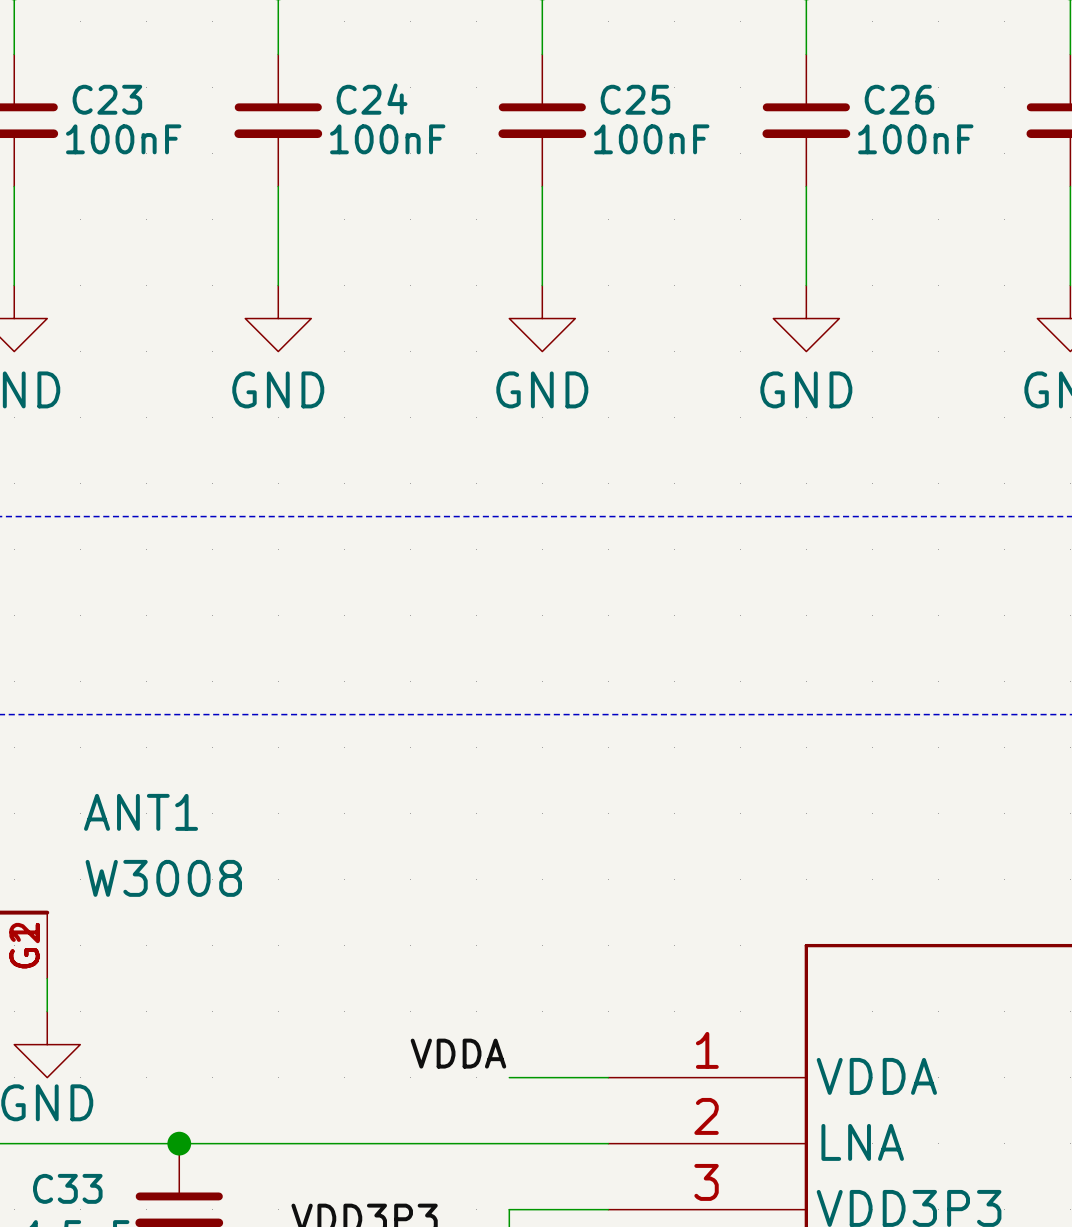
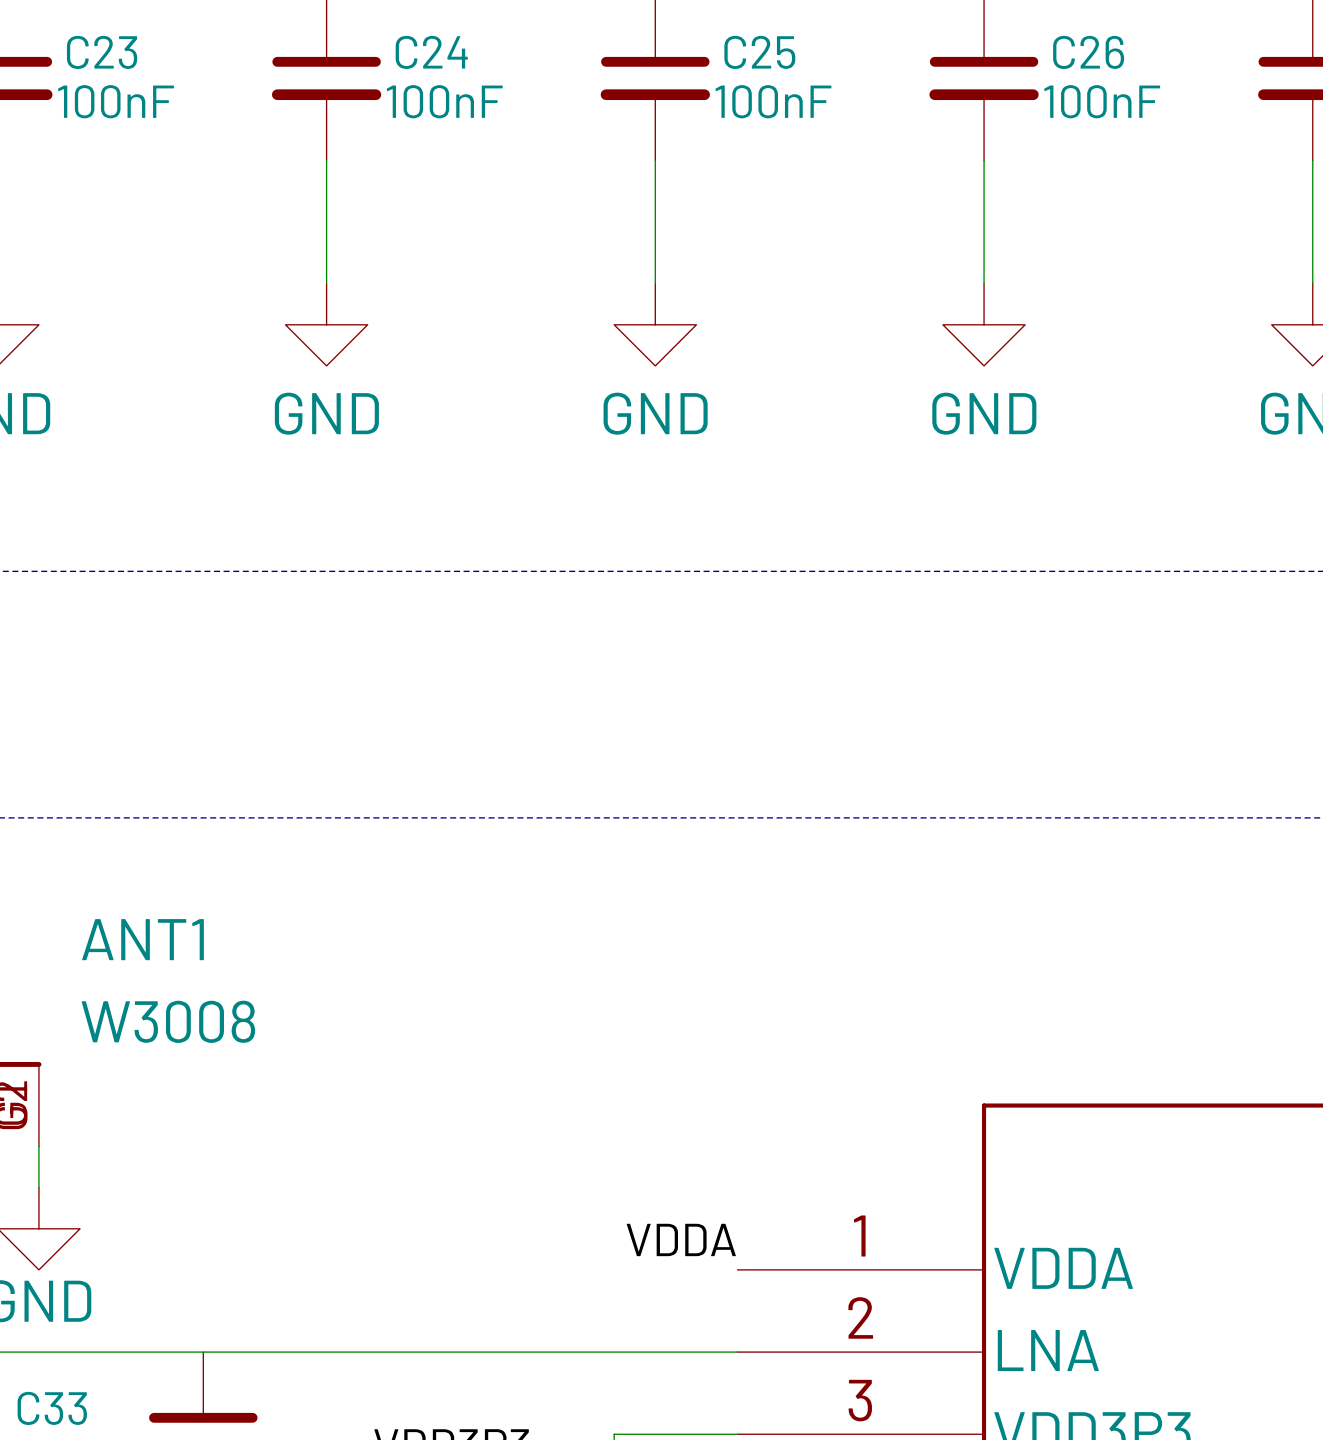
label position: VDDA (458, 1053) -> VDDA (681, 1239)
wire: (509, 1077) (608, 1077) -> none
junction: (179, 1143) -> none

